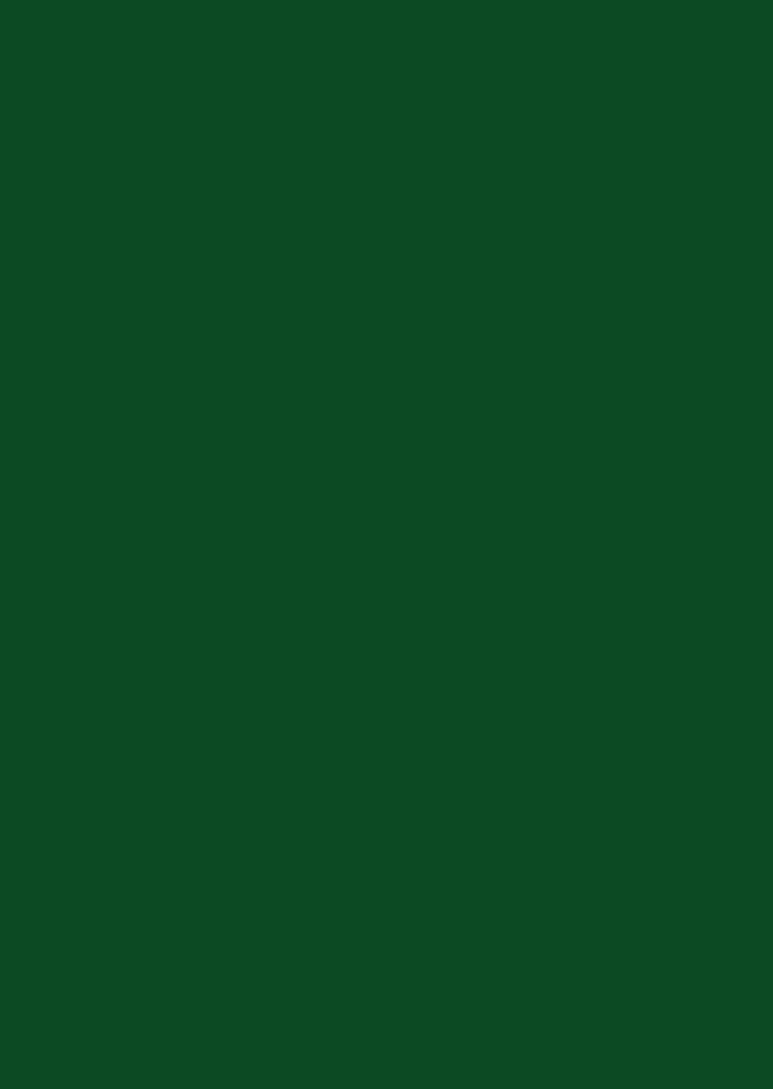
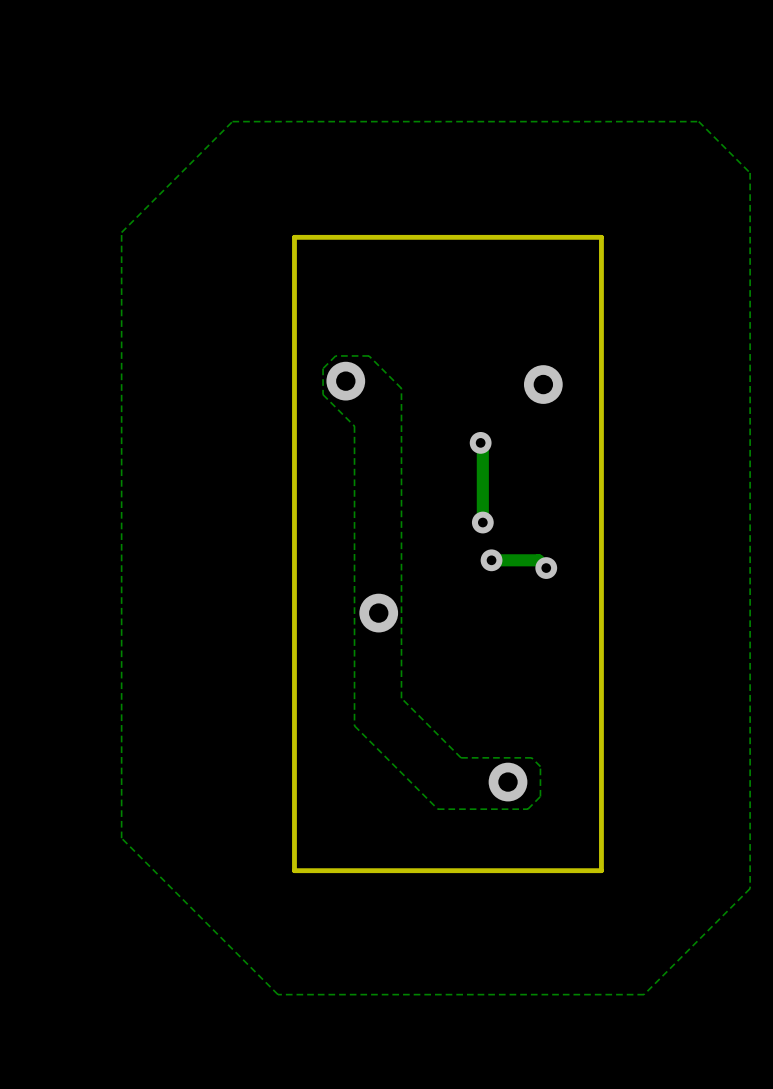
zone outline: none -> (698, 121) (232, 121) (121, 232) (121, 838) (278, 994) (644, 994) (750, 888) (750, 172) (698, 121)
board edge: none -> (601, 237) (294, 237) (294, 870) (601, 870) (601, 237)
zone outline: none -> (369, 355) (401, 388) (401, 698) (461, 757) (531, 757) (540, 766) (540, 796) (527, 809) (437, 809) (354, 725) (354, 426) (323, 394) (323, 368) (335, 355) (369, 355)
via: none -> (345, 381)
via: none -> (543, 384)
track: none -> (480, 442) (482, 445) (482, 522)
via: none -> (480, 442)
via: none -> (482, 522)
track: none -> (491, 560) (538, 560) (546, 568)
via: none -> (491, 560)
via: none -> (546, 568)
via: none -> (378, 613)
via: none -> (508, 782)

